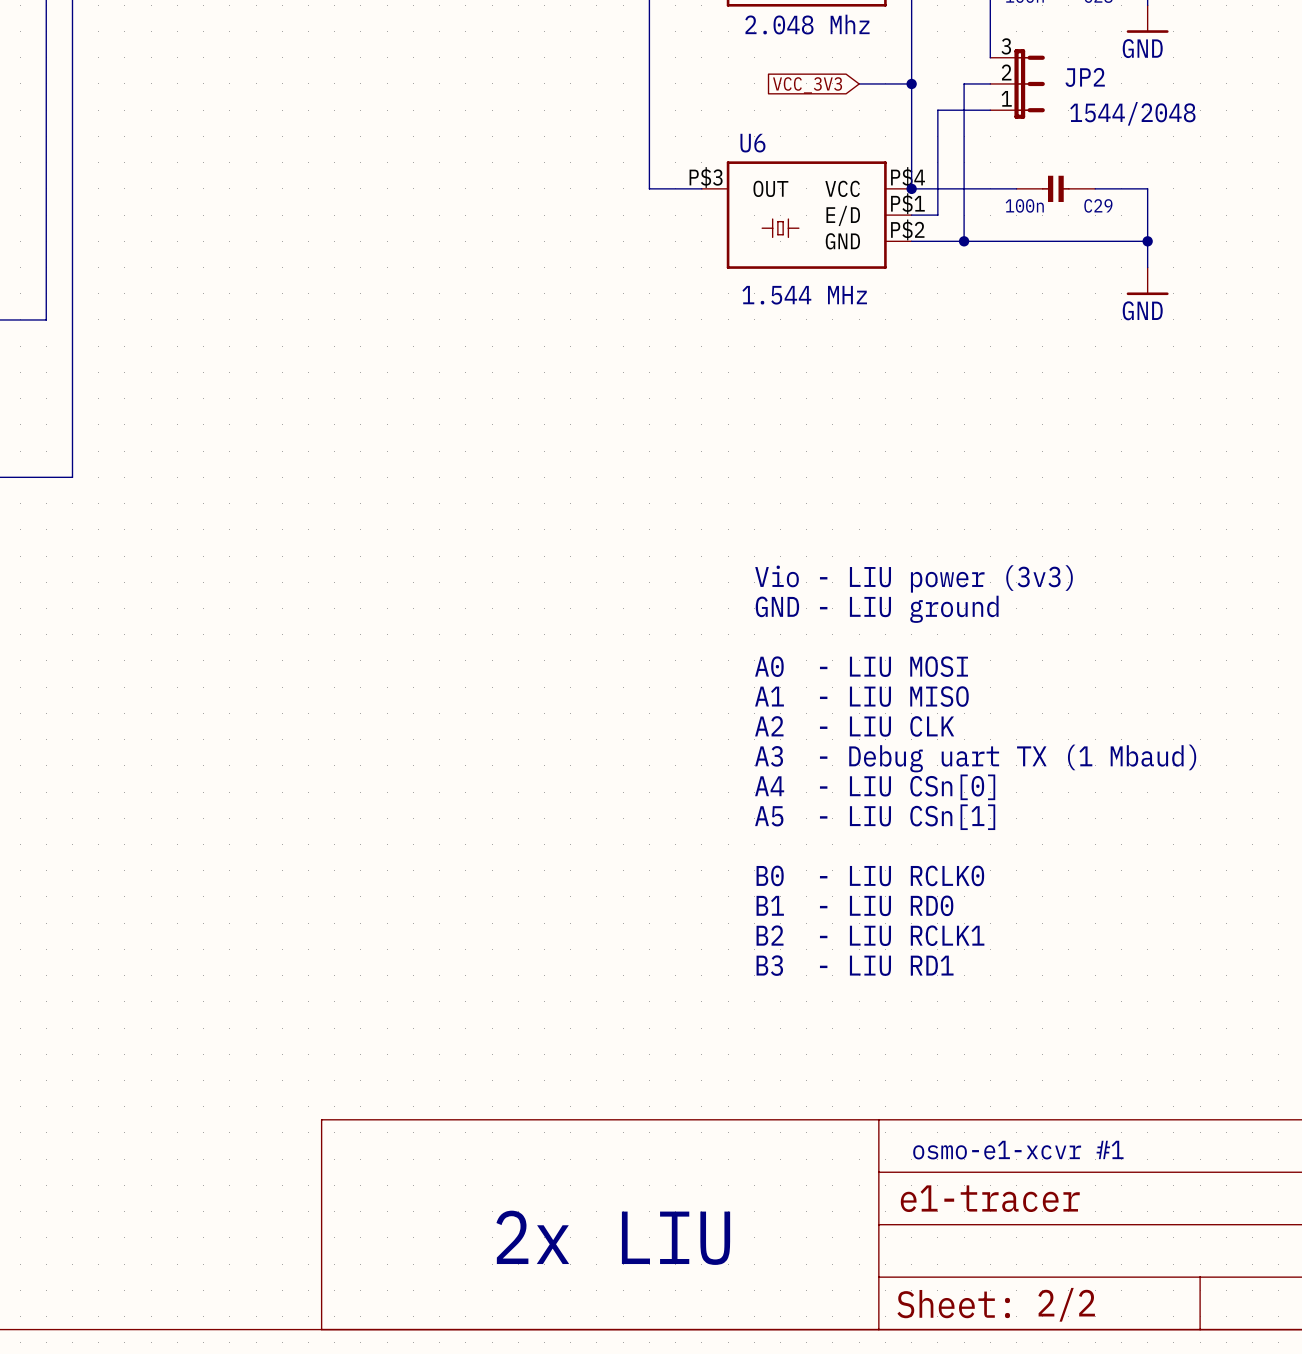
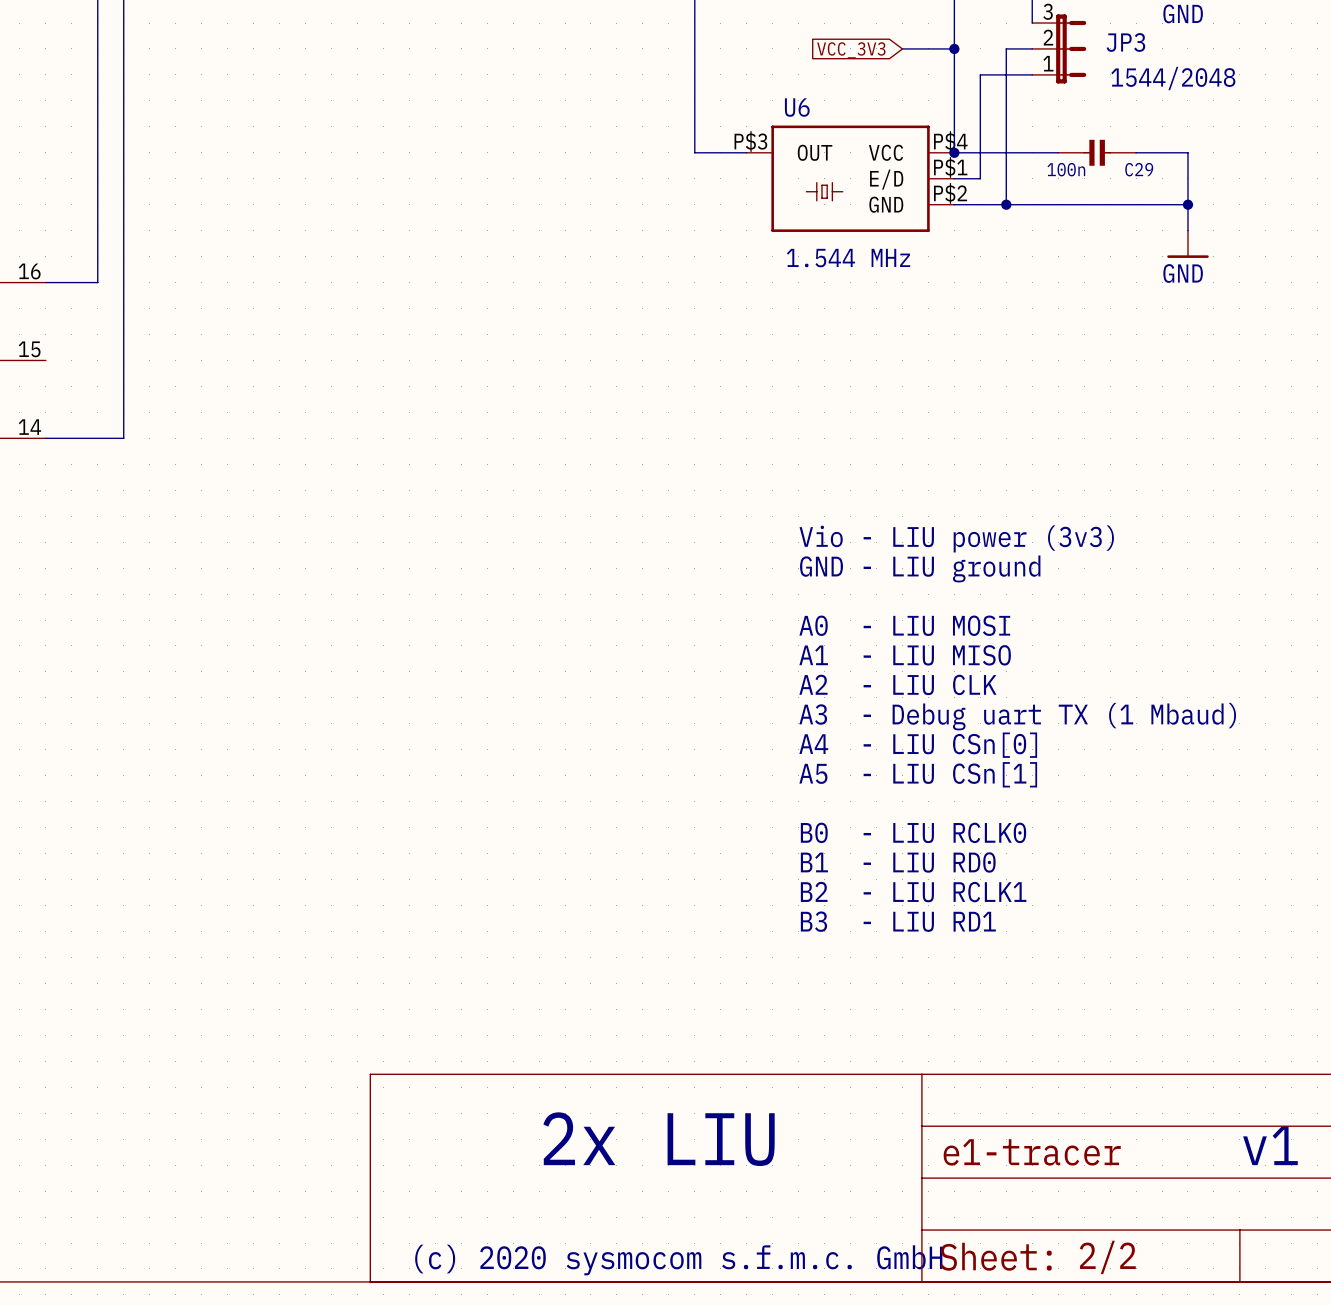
JP2 name: JP2 (1085, 77) -> JP3 (1125, 42)
text: osmo-e1-xcvr #1 (1018, 1150) -> none
text: none -> v1 (1270, 1145)
text position: 2x LIU (613, 1237) -> 2x LIU (659, 1139)
text: none -> (c) 2020 sysmocom s.f.m.c. GmbH (678, 1260)

